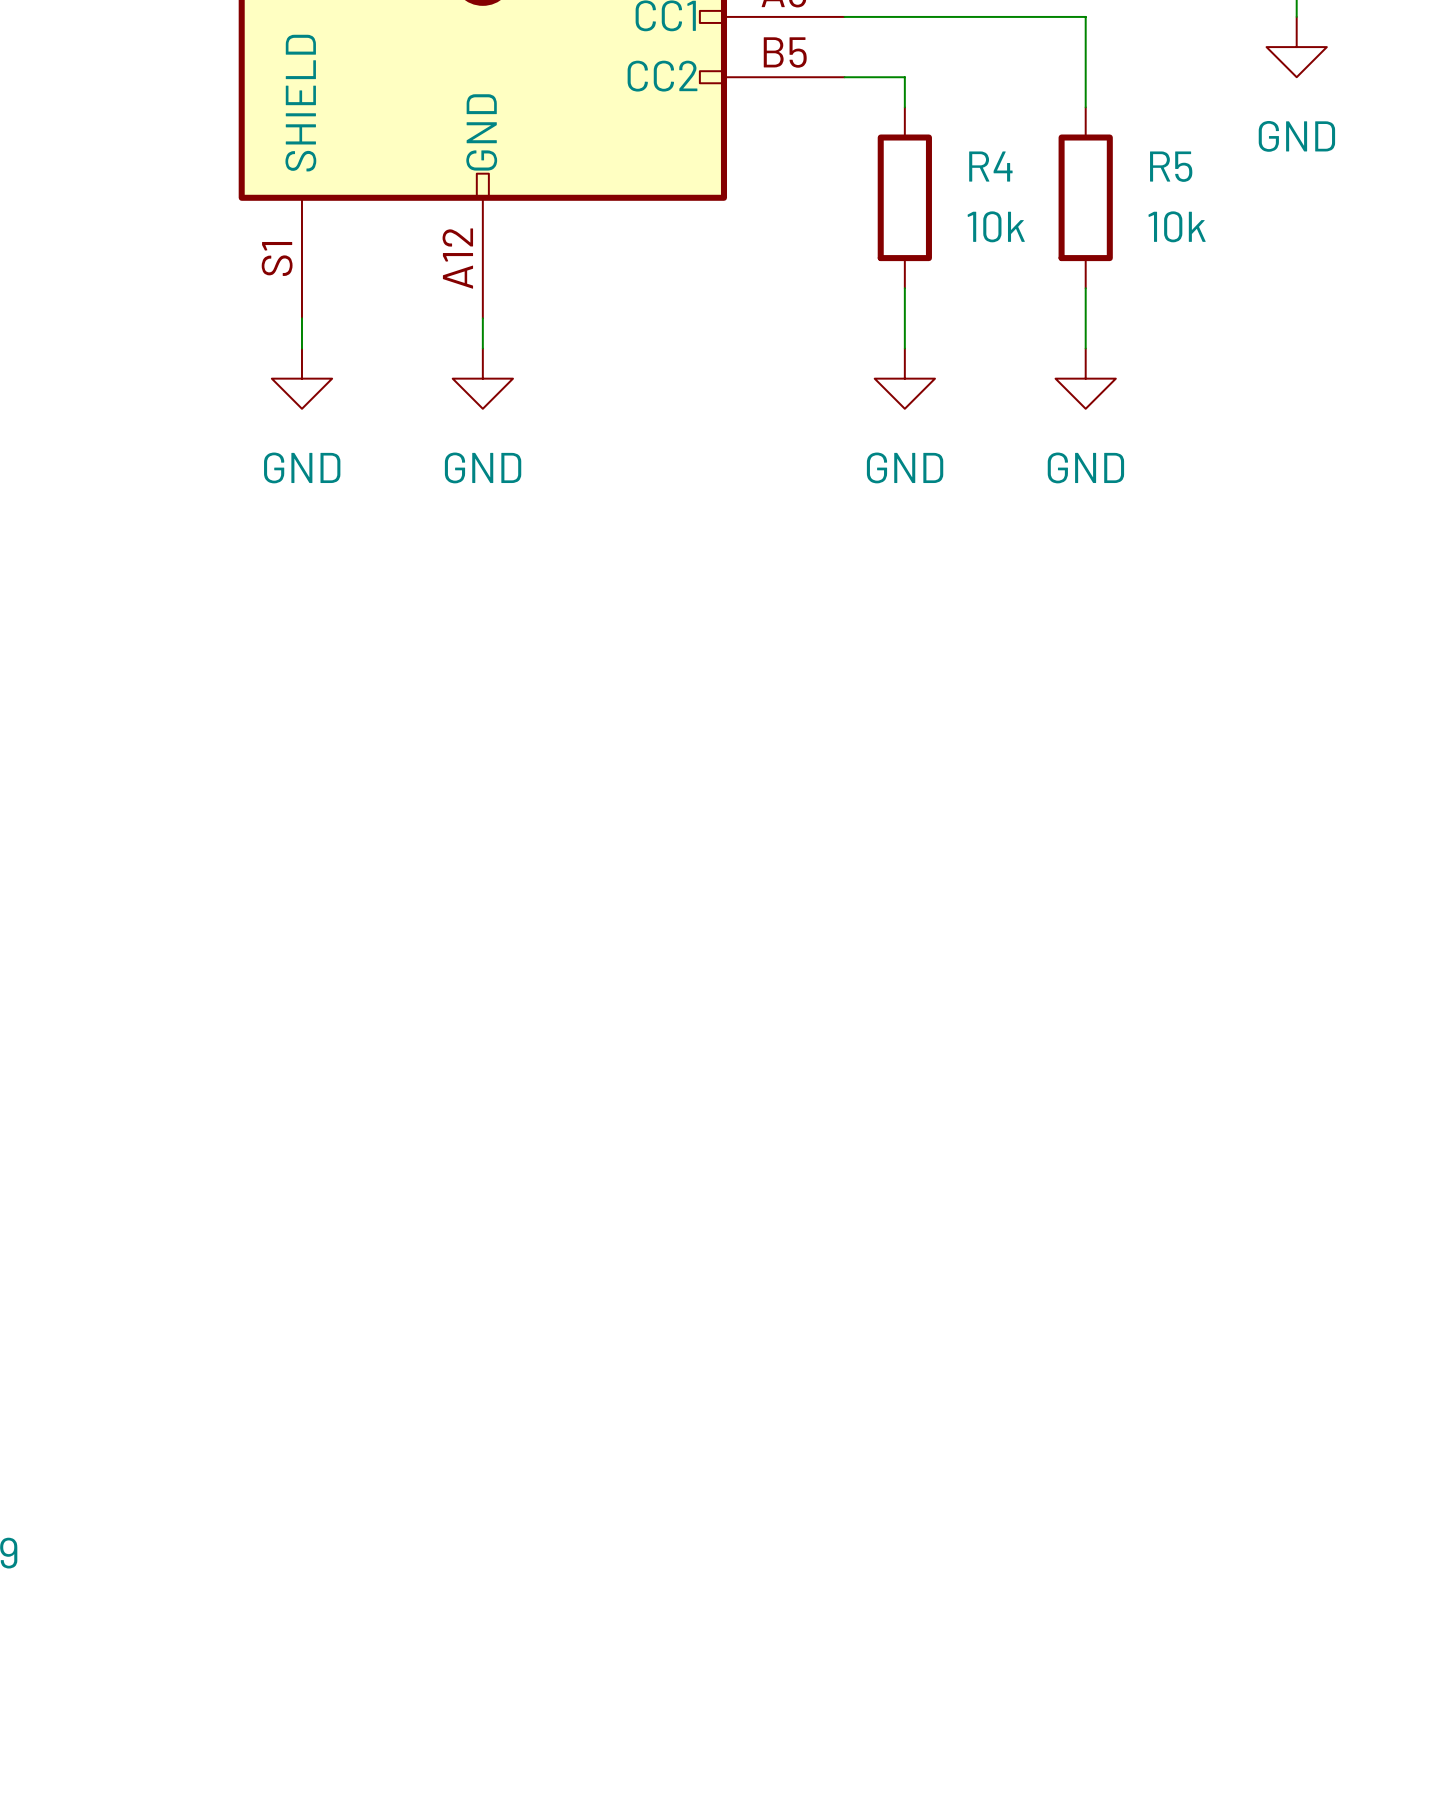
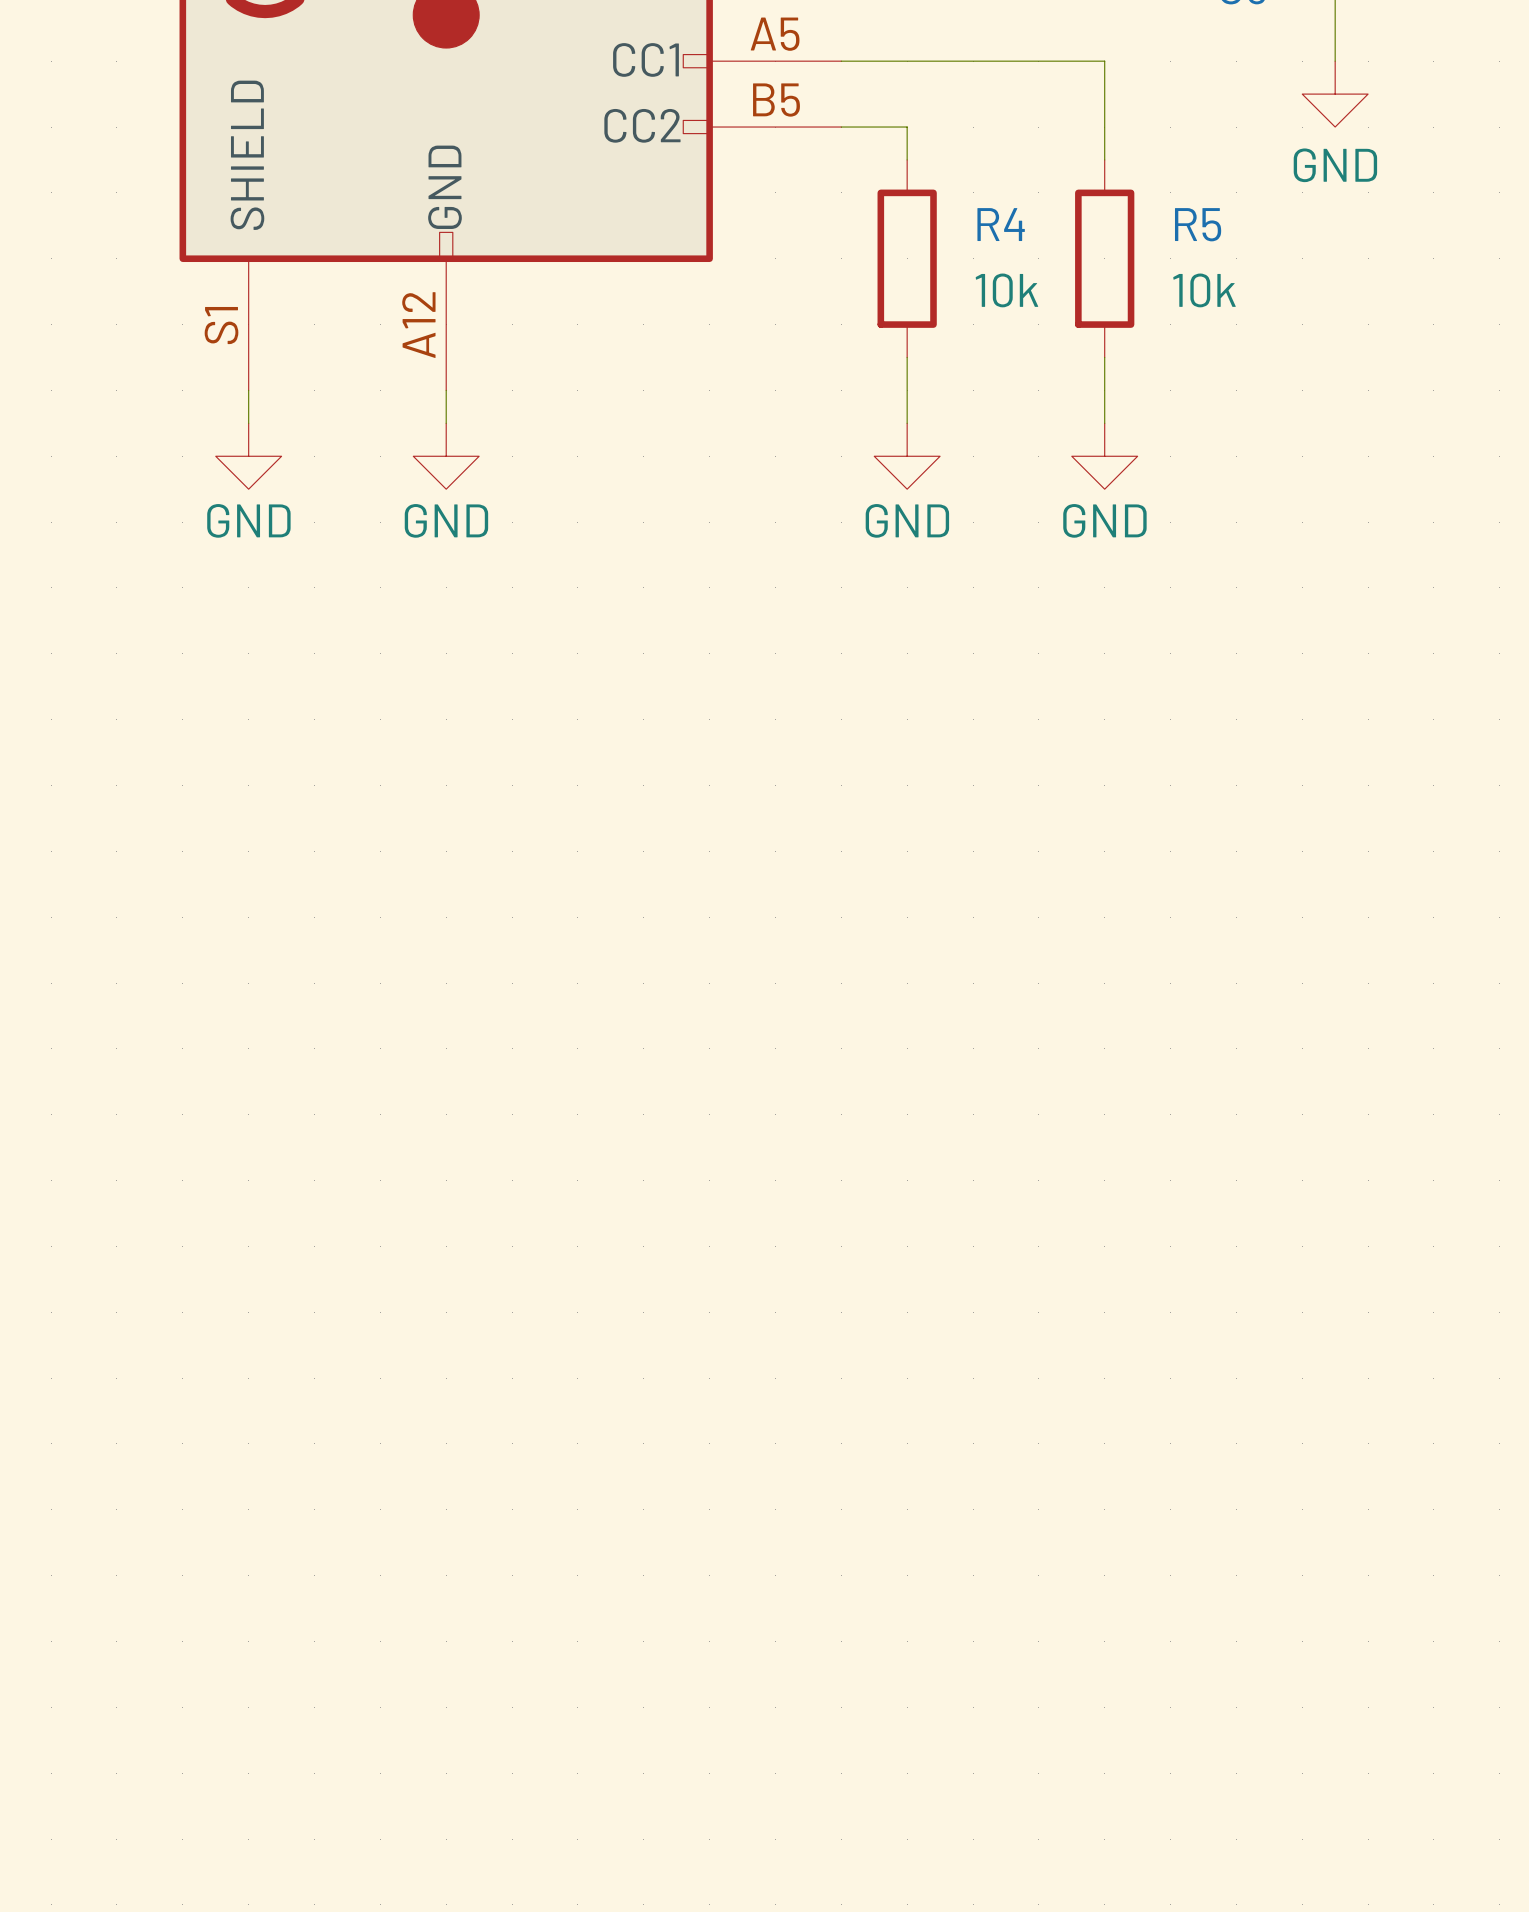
power symbol text position: GND (1296, 136) -> GND (1335, 165)
power symbol text position: GND (302, 467) -> GND (248, 520)
power symbol text position: GND (483, 467) -> GND (446, 520)
power symbol text position: GND (905, 467) -> GND (907, 520)
power symbol text position: GND (1085, 467) -> GND (1104, 520)

